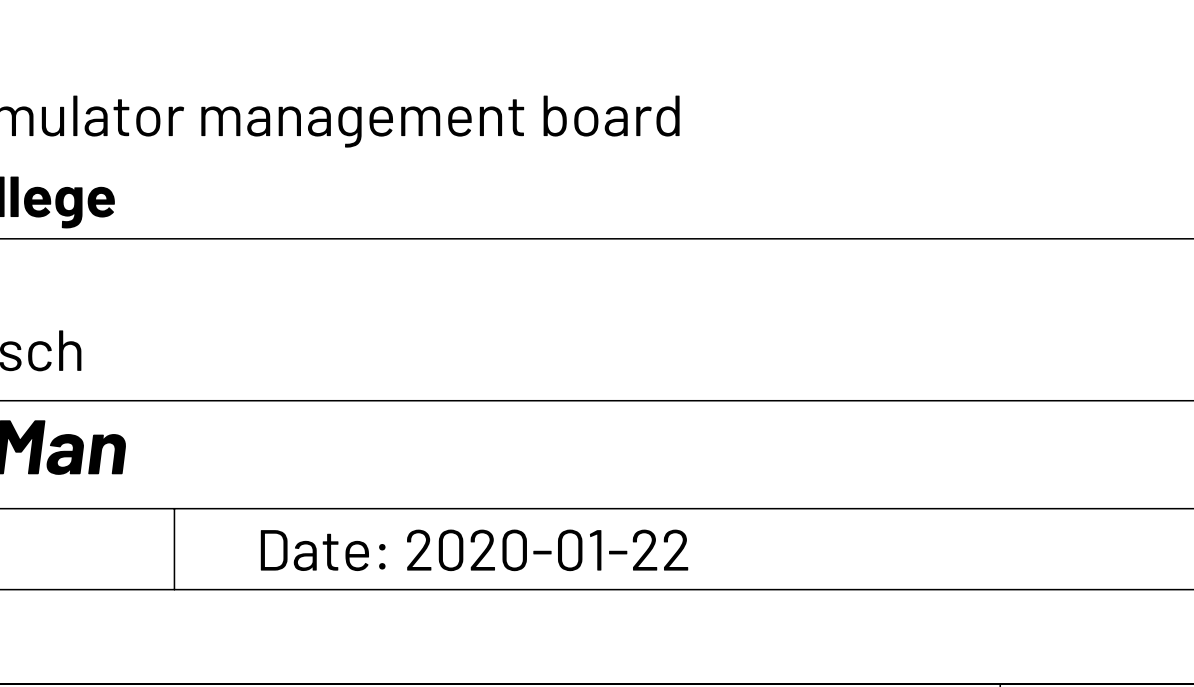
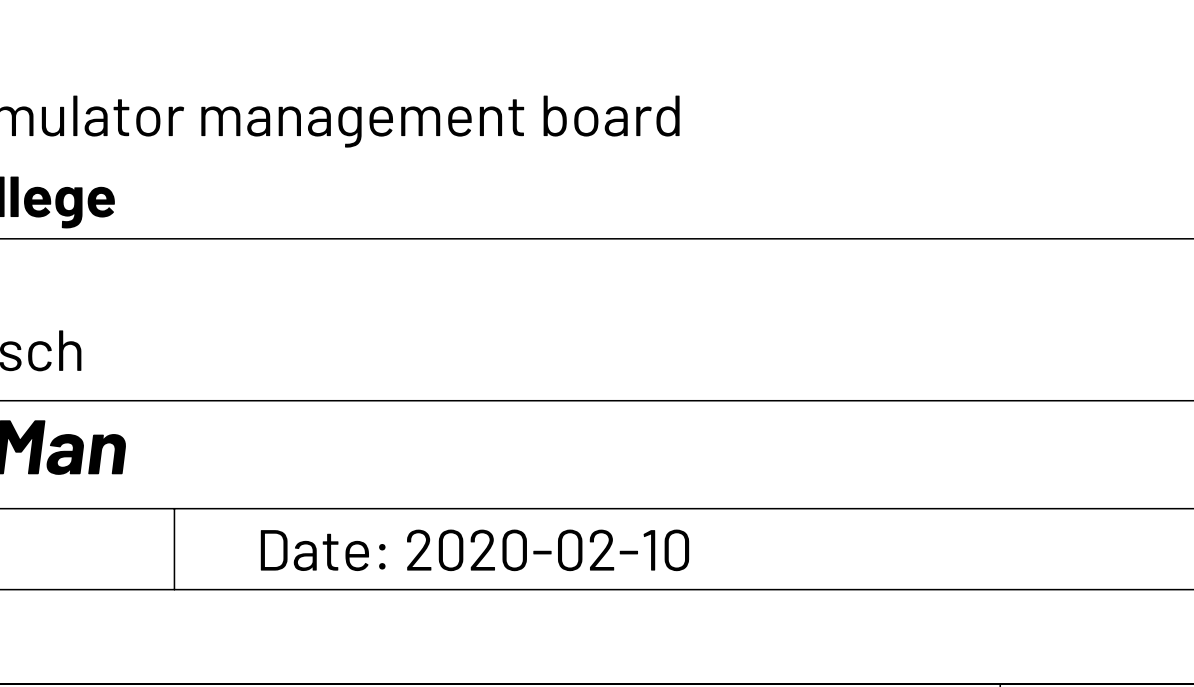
title block: Date: 2020-01-22 (474, 550) -> Date: 2020-02-10 (474, 550)

